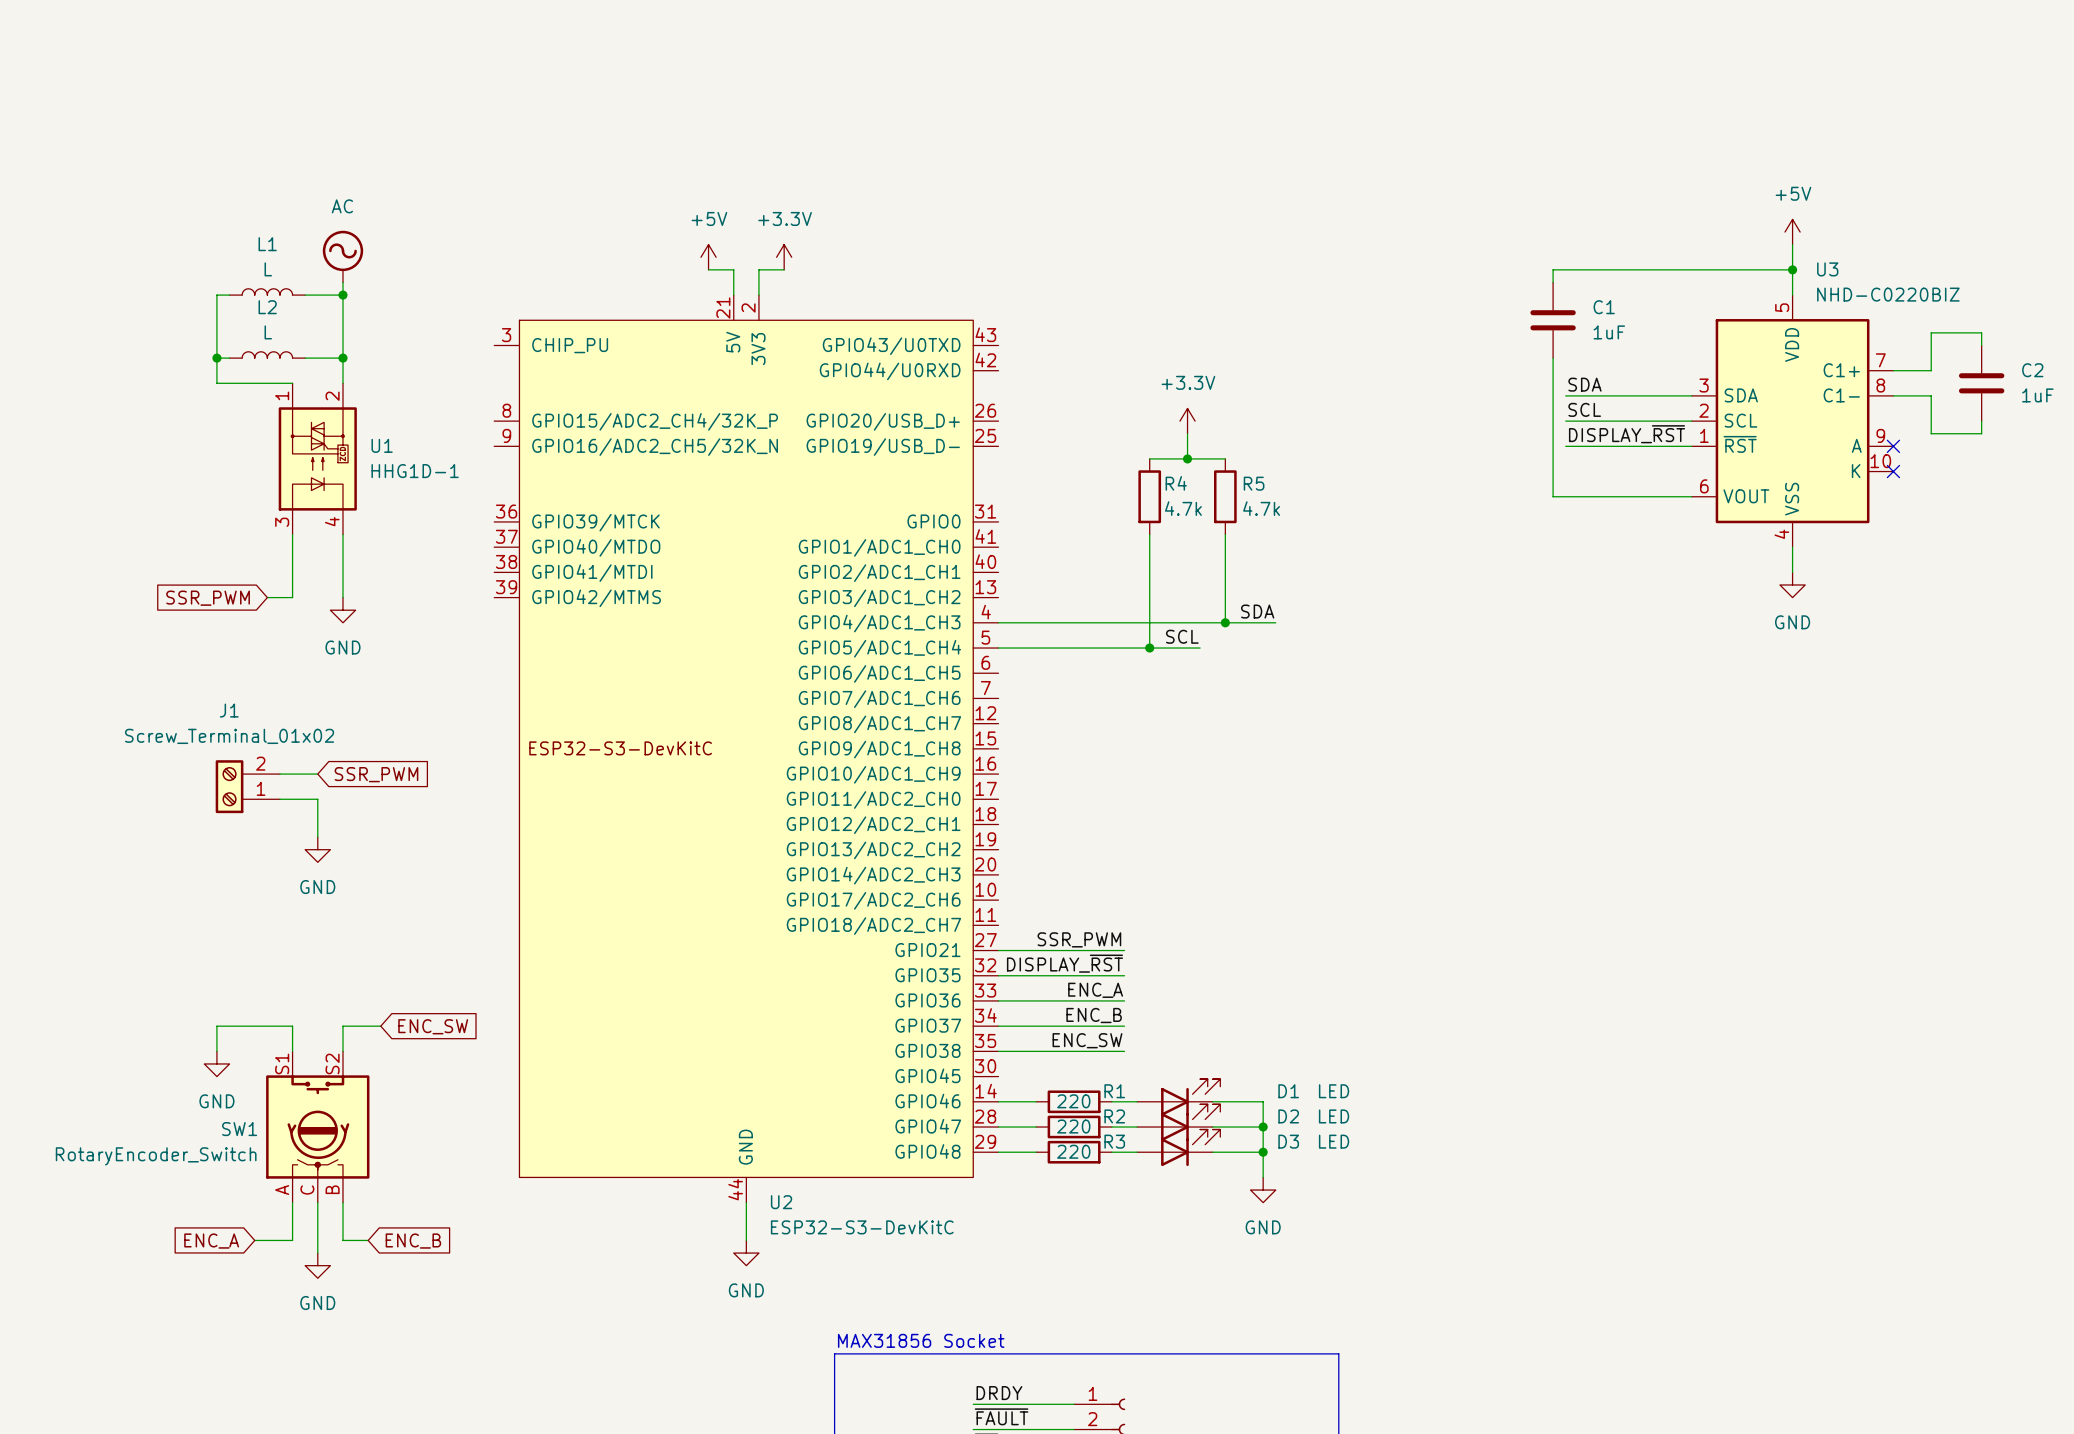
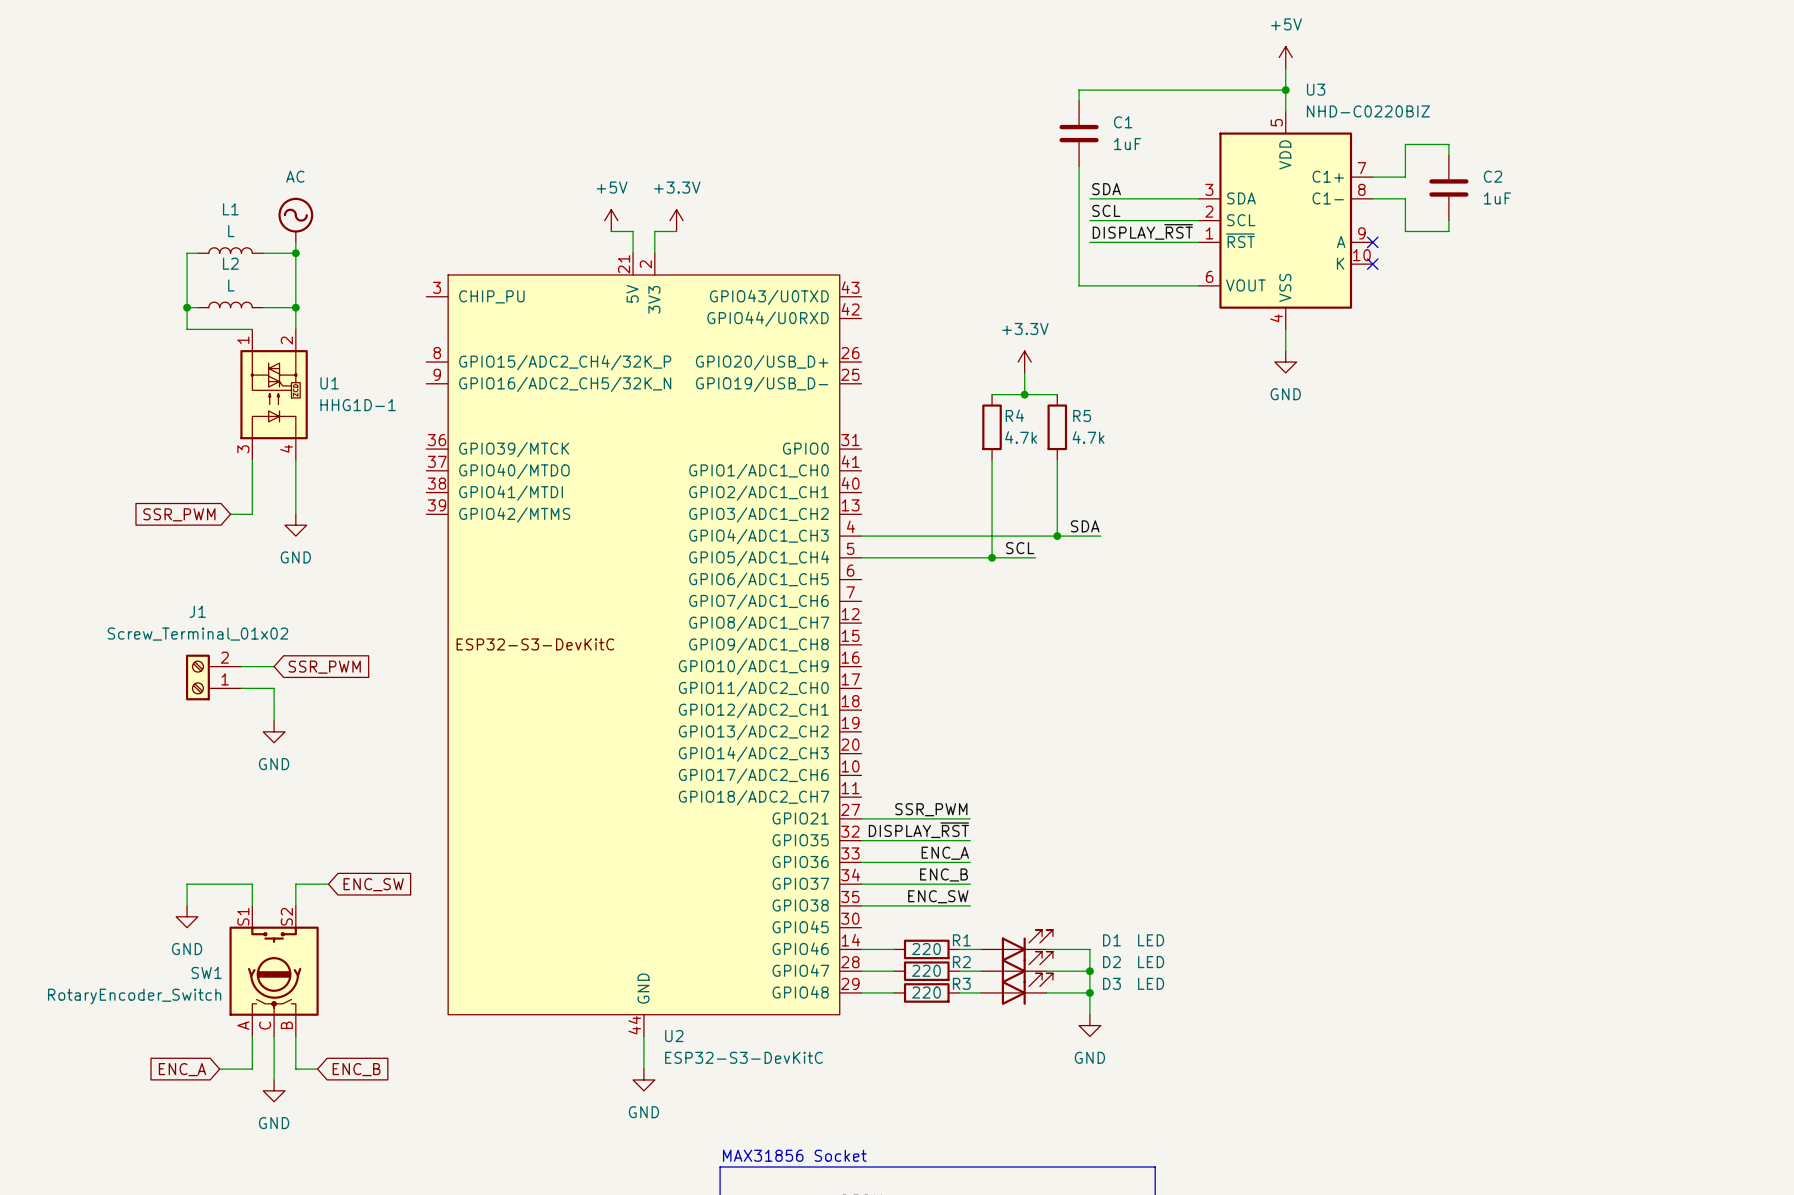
power symbol: none -> +5V (1285, 57)
wire: none -> (1285, 68) (1285, 111)
wire: none -> (1285, 90) (1079, 90) (1079, 100)
junction: none -> (1285, 90)
wire: none -> (1448, 155) (1448, 144) (1405, 144) (1405, 177) (1372, 177)
wire: none -> (1079, 166) (1079, 285) (1198, 285)
label: none -> SDA (1106, 189)
wire: none -> (1089, 198) (1198, 198)
power symbol: +5V (1792, 232) -> none
wire: (1792, 244) (1792, 295) -> none
label: none -> SCL (1106, 210)
wire: none -> (1089, 220) (1198, 220)
wire: (1628, 269) (1553, 269) (1553, 282) -> (1405, 231) (1405, 198) (1372, 198)
wire: (1679, 269) (1792, 269) -> (1448, 231) (1448, 220)
junction: (1792, 269) -> none
label: none -> DISPLAY_~{RST} (1142, 231)
wire: none -> (1089, 242) (1198, 242)
no-connect mark: none -> (1372, 242)
no-connect mark: none -> (1372, 264)
C1 position: (1553, 320) -> (1079, 133)
wire: (1981, 345) (1981, 332) (1931, 332) (1931, 370) (1893, 370) -> none
wire: (1553, 358) (1553, 496) (1691, 496) -> none
wire: none -> (1285, 329) (1285, 351)
C2 position: (1981, 383) -> (1448, 187)
label: SDA (1584, 384) -> none
wire: (1565, 395) (1691, 395) -> none
wire: (1893, 395) (1931, 395) (1931, 433) (1981, 433) (1981, 421) -> none
label: SCL (1584, 409) -> none
power symbol: none -> GND (1285, 362)
wire: (1565, 421) (1691, 421) -> none
U3 position: (1792, 421) -> (1285, 220)
label: DISPLAY_~{RST} (1627, 434) -> none
wire: (1565, 446) (1691, 446) -> none
no-connect mark: (1893, 446) -> none
no-connect mark: (1893, 471) -> none
wire: (1792, 547) (1792, 572) -> none
power symbol: GND (1792, 584) -> none

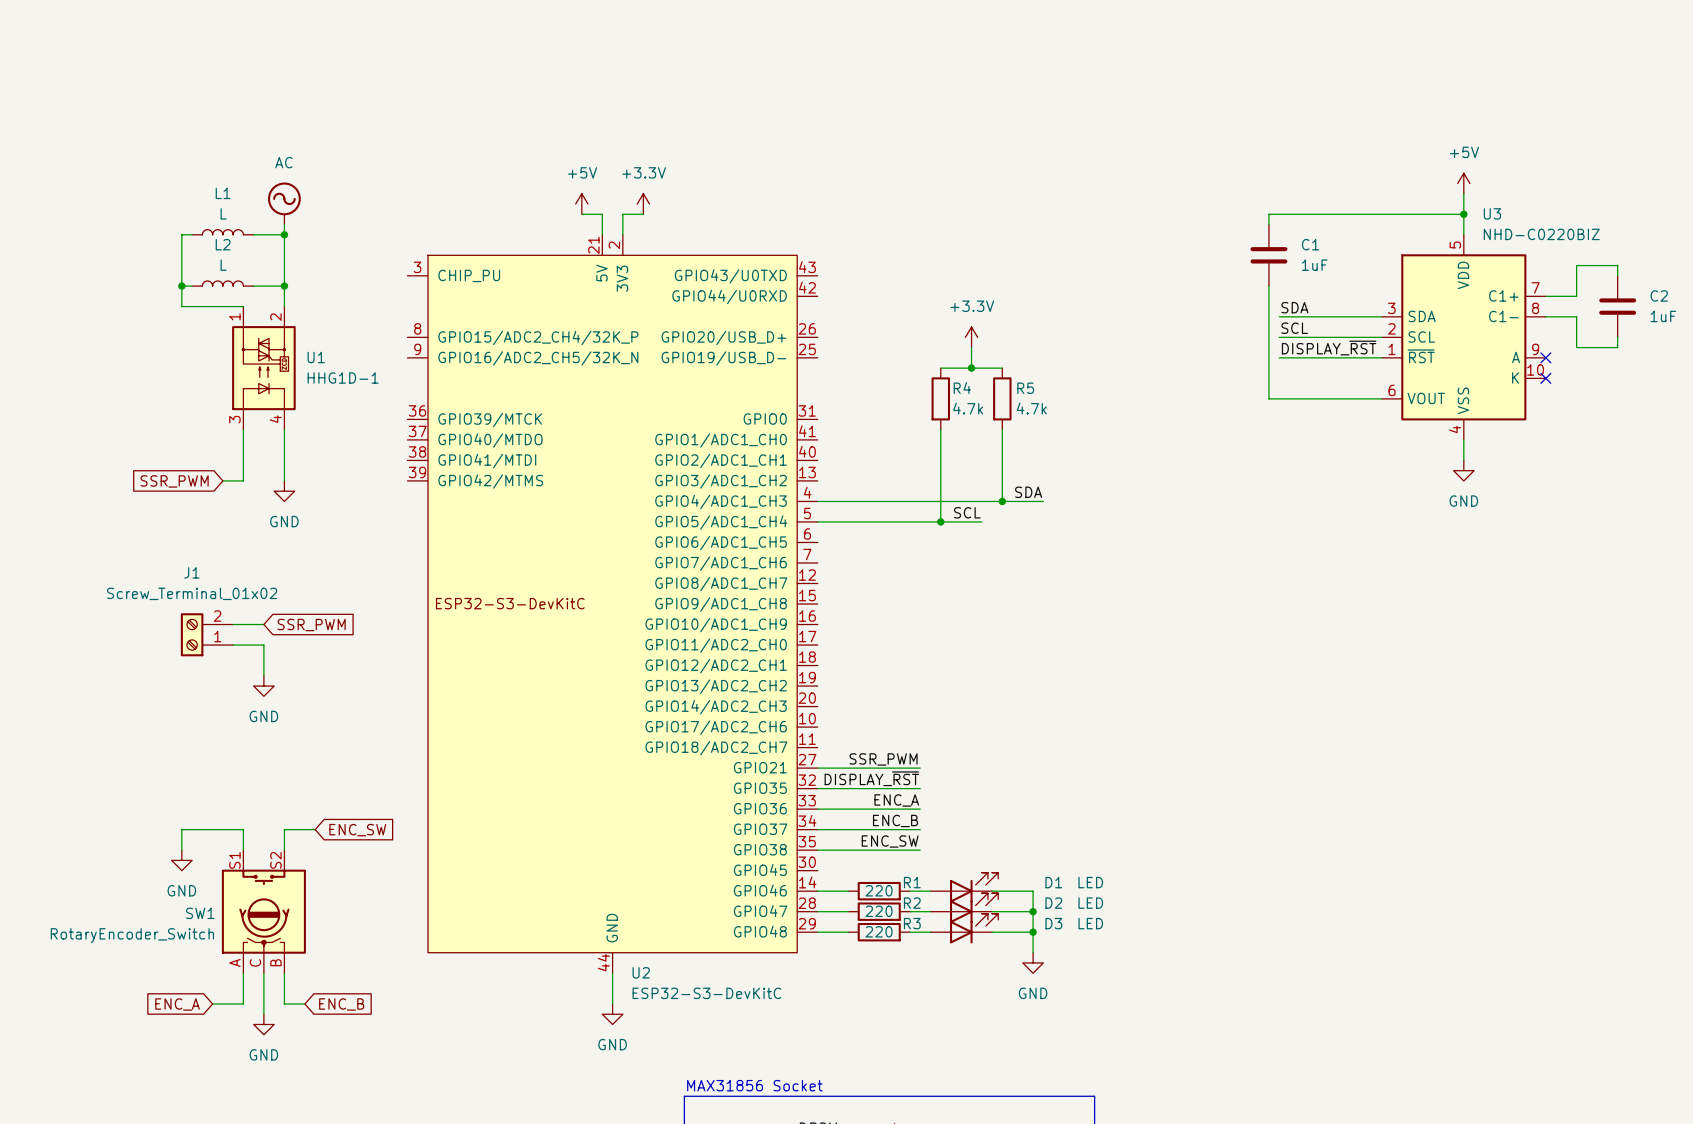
power symbol: +5V (1285, 57) -> none
wire: (1285, 68) (1285, 111) -> none
wire: (1285, 90) (1079, 90) (1079, 100) -> none
junction: (1285, 90) -> none
C1 position: (1079, 133) -> (1268, 255)
wire: (1448, 155) (1448, 144) (1405, 144) (1405, 177) (1372, 177) -> none
wire: (1079, 166) (1079, 285) (1198, 285) -> none
C2 position: (1448, 187) -> (1617, 306)
label: SDA (1106, 189) -> none
wire: (1089, 198) (1198, 198) -> none
wire: (1372, 198) (1405, 198) (1405, 231) -> (1268, 224) (1268, 214) (1330, 214)
power symbol: none -> +5V (1463, 183)
wire: none -> (1463, 193) (1463, 234)
label: SCL (1106, 210) -> none
wire: (1089, 220) (1198, 220) -> none
U3 position: (1285, 220) -> (1463, 337)
wire: (1448, 220) (1448, 231) -> (1463, 214) (1371, 214)
label: DISPLAY_~{RST} (1142, 231) -> none
junction: none -> (1463, 214)
wire: (1089, 242) (1198, 242) -> none
no-connect mark: (1372, 242) -> none
no-connect mark: (1372, 264) -> none
wire: none -> (1617, 275) (1617, 265) (1576, 265) (1576, 296) (1545, 296)
wire: none -> (1268, 286) (1268, 398) (1381, 398)
wire: (1285, 329) (1285, 351) -> none
label: none -> SDA (1294, 307)
wire: none -> (1279, 316) (1381, 316)
wire: none -> (1545, 316) (1576, 316) (1576, 347) (1617, 347) (1617, 337)
label: none -> SCL (1294, 328)
power symbol: GND (1285, 362) -> none
wire: none -> (1279, 337) (1381, 337)
label: none -> DISPLAY_~{RST} (1329, 348)
wire: none -> (1279, 357) (1381, 357)
no-connect mark: none -> (1545, 357)
no-connect mark: none -> (1545, 378)
wire: none -> (1463, 439) (1463, 460)
power symbol: none -> GND (1463, 470)

